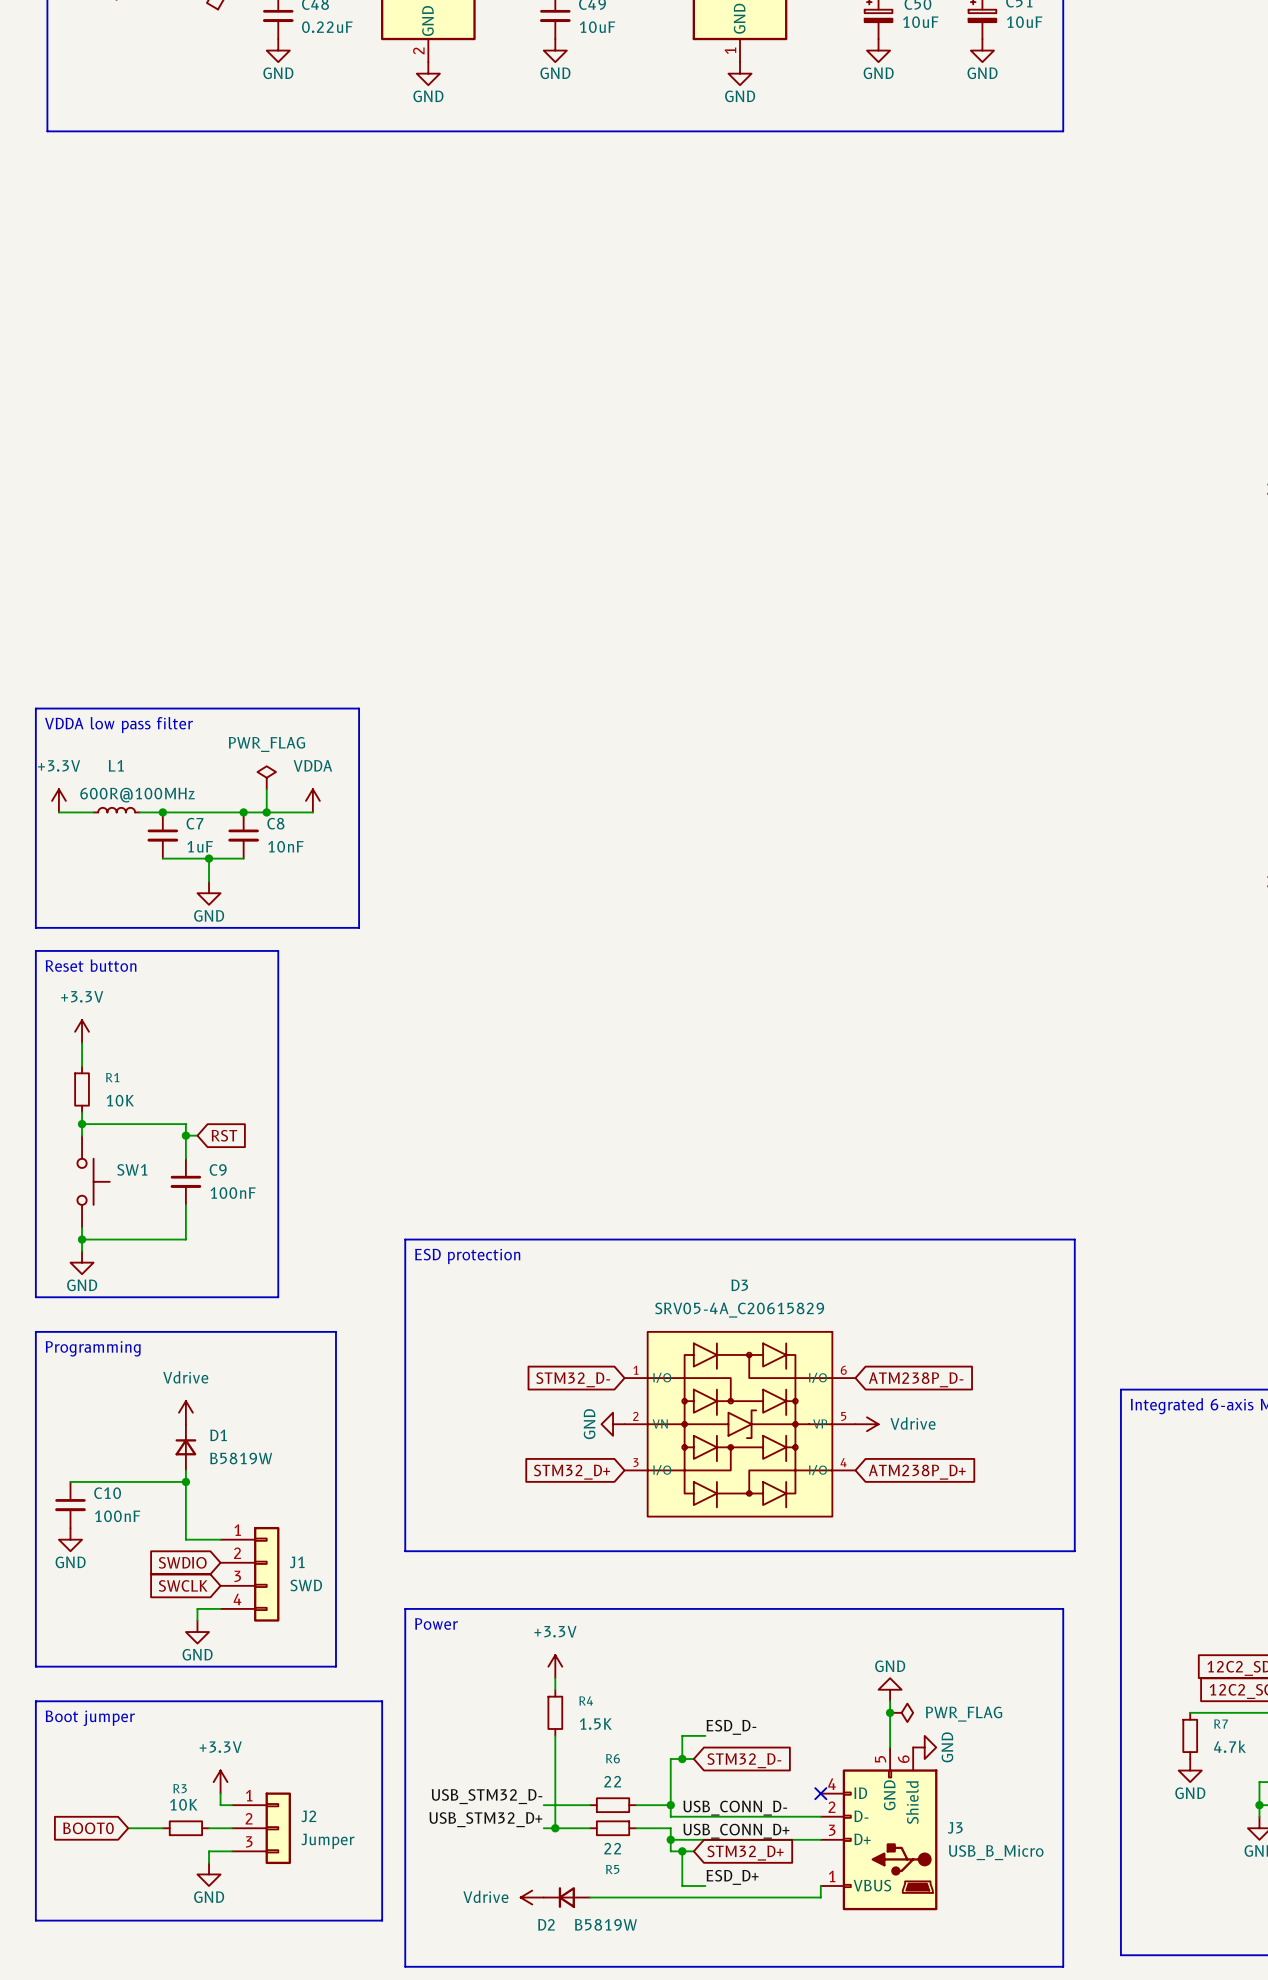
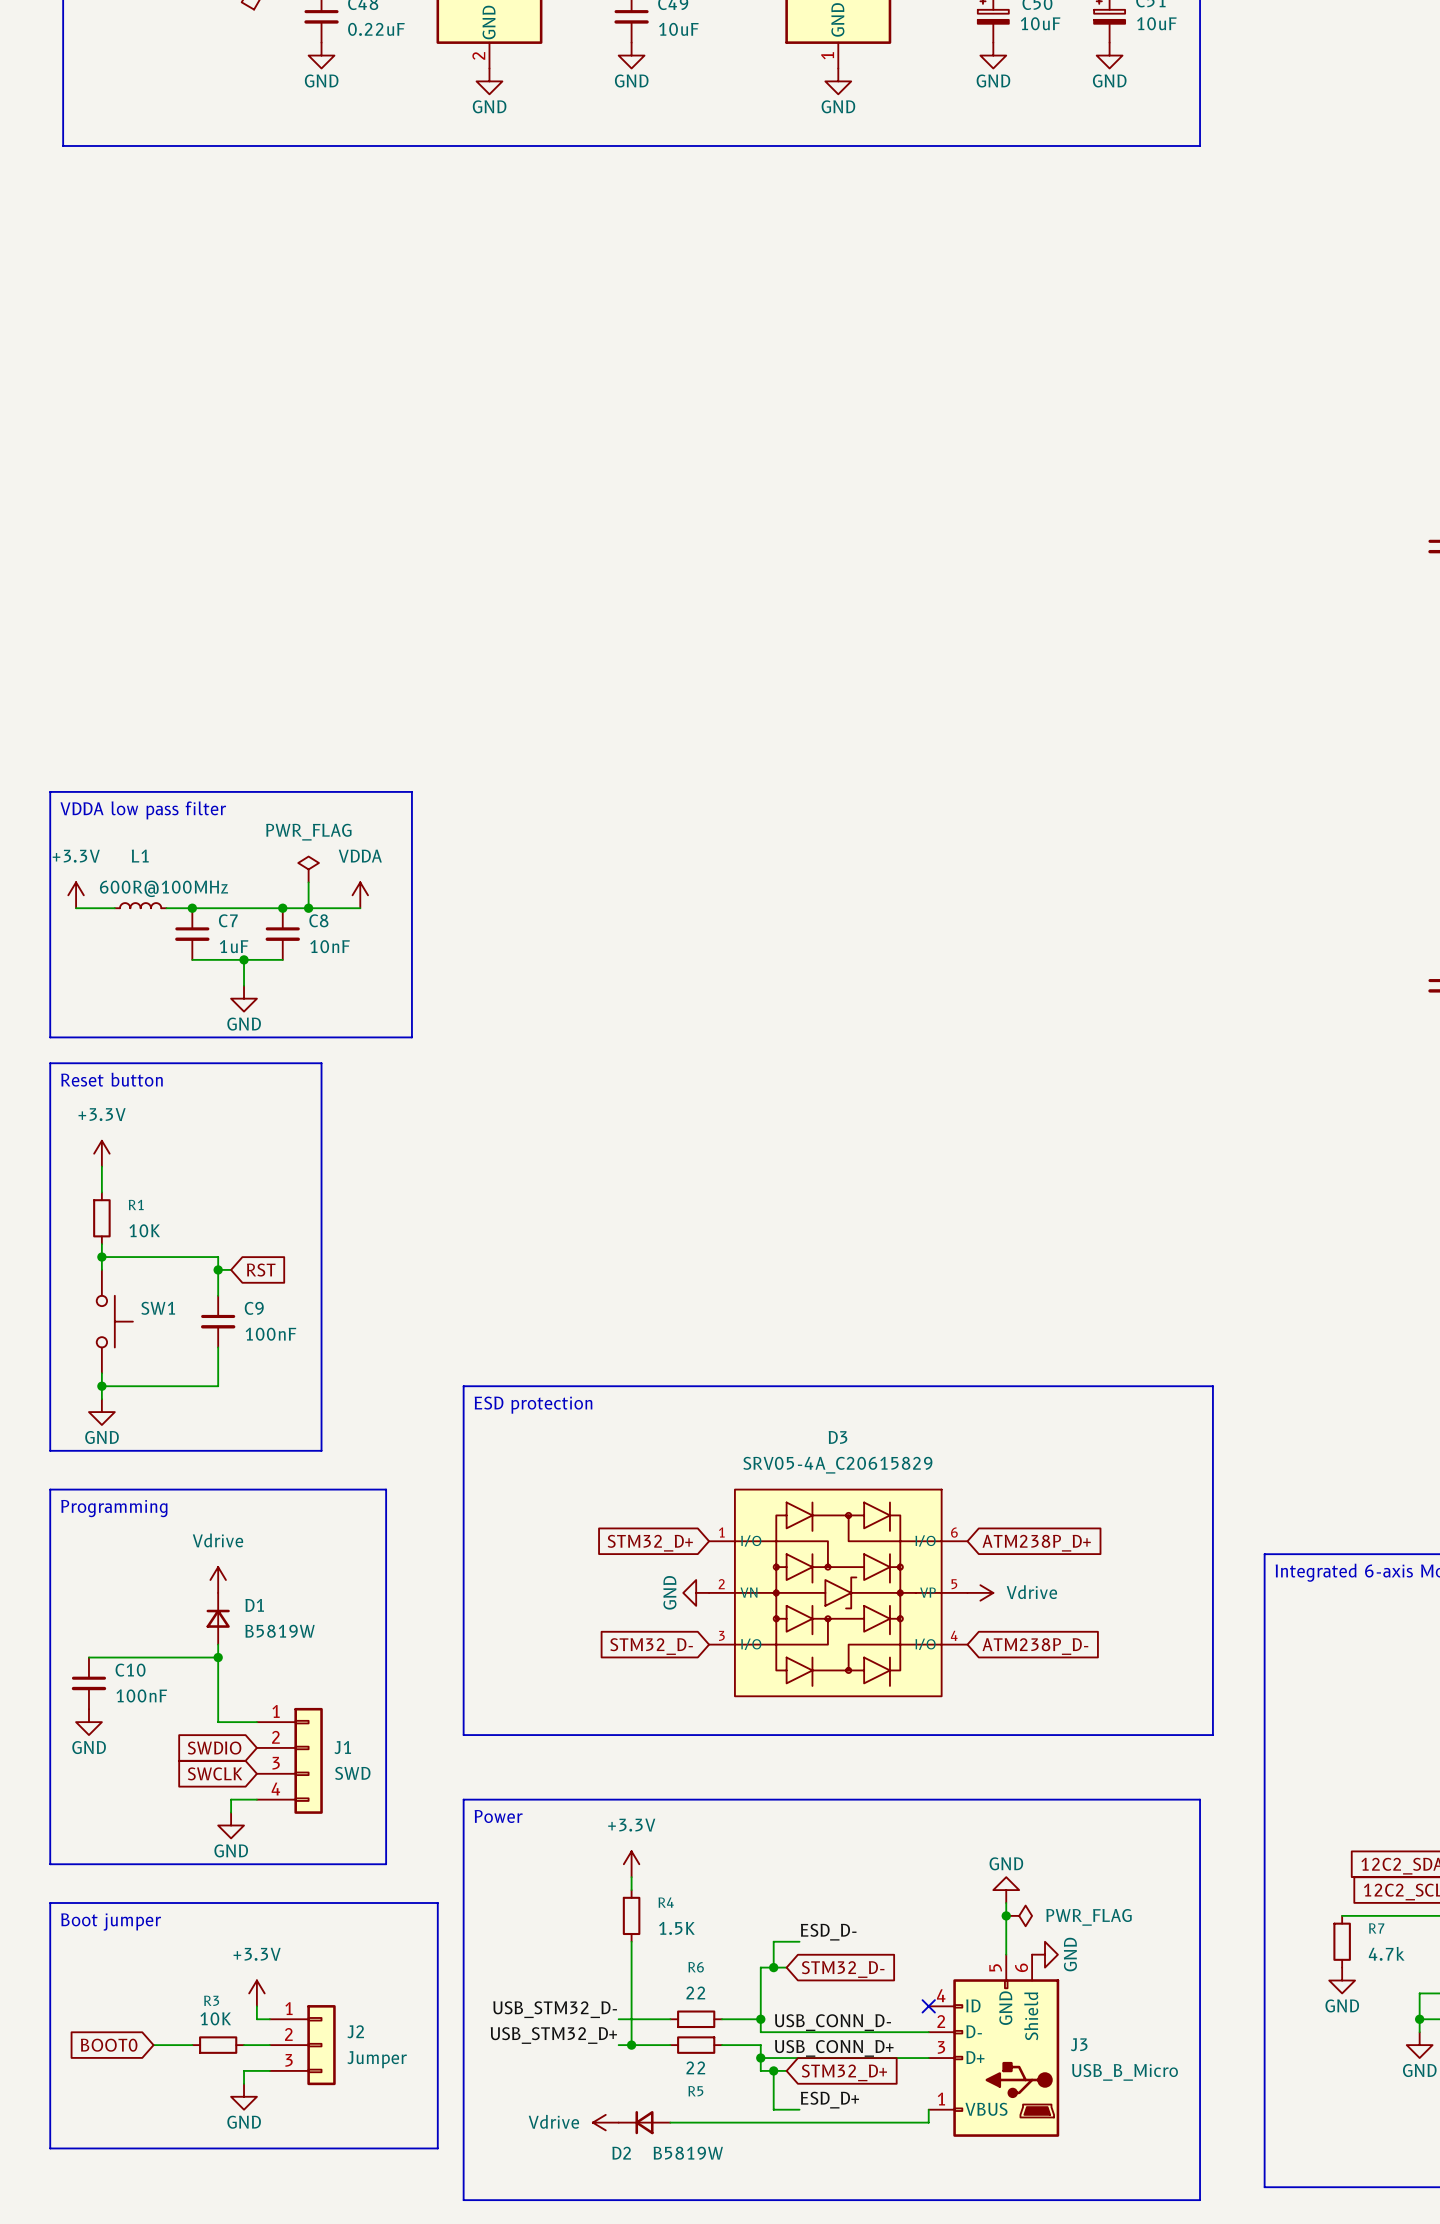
global label: STM32_D- (573, 1379) -> STM32_D+ (650, 1543)
global label: ATM238P_D- (916, 1379) -> ATM238P_D+ (1036, 1543)
global label: STM32_D+ (572, 1472) -> STM32_D- (651, 1646)
global label: ATM238P_D+ (917, 1472) -> ATM238P_D- (1035, 1646)

